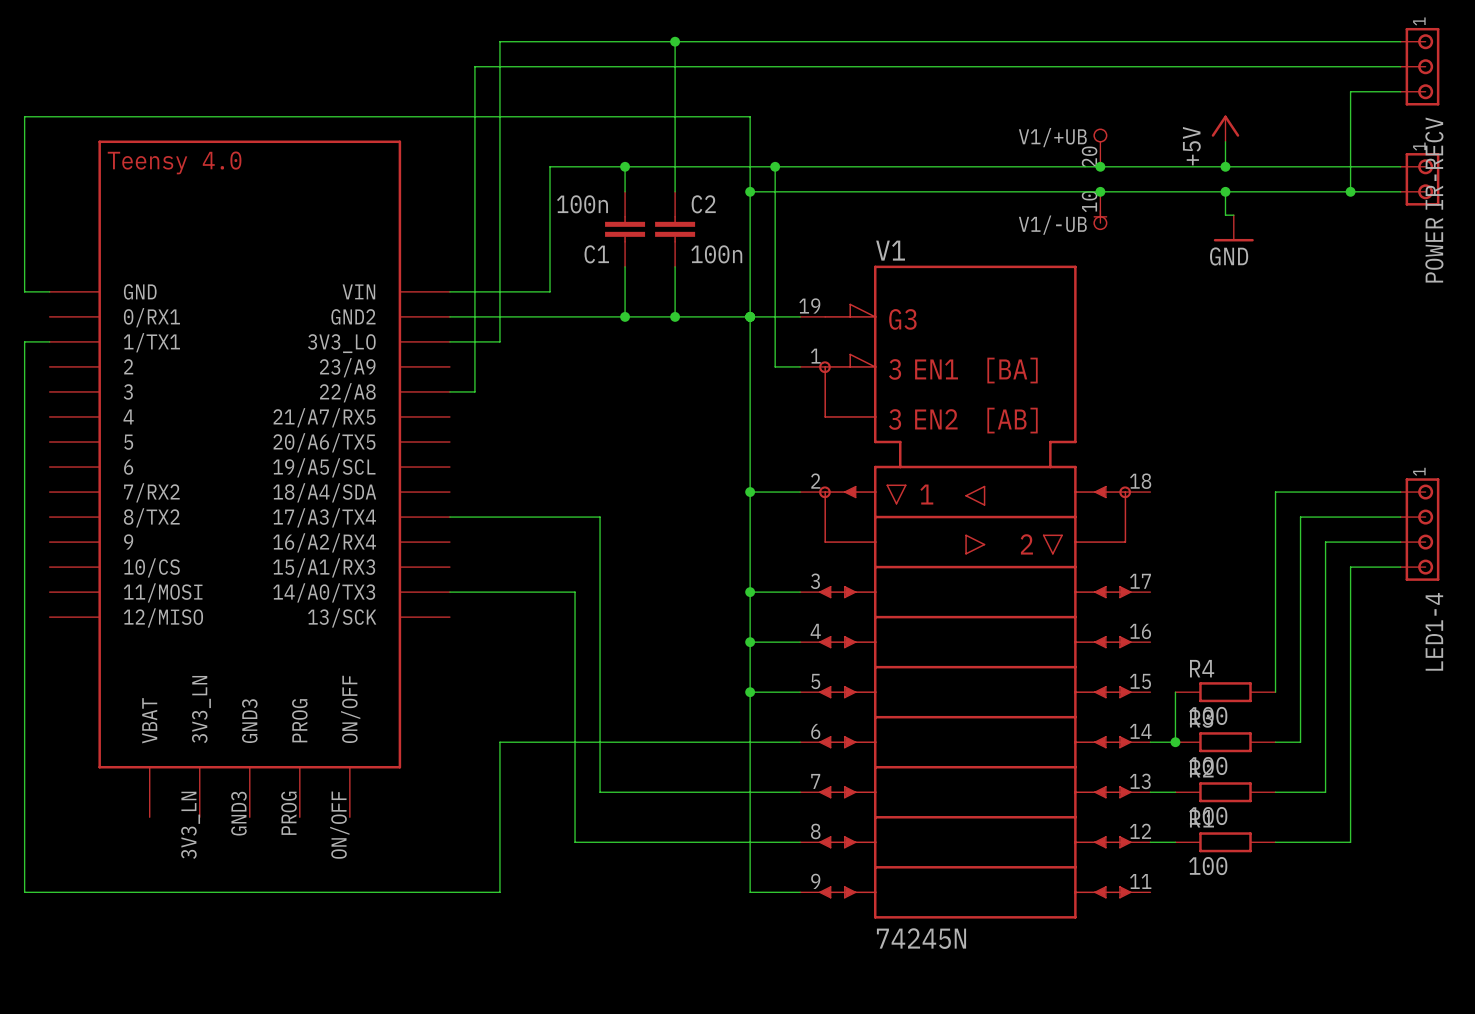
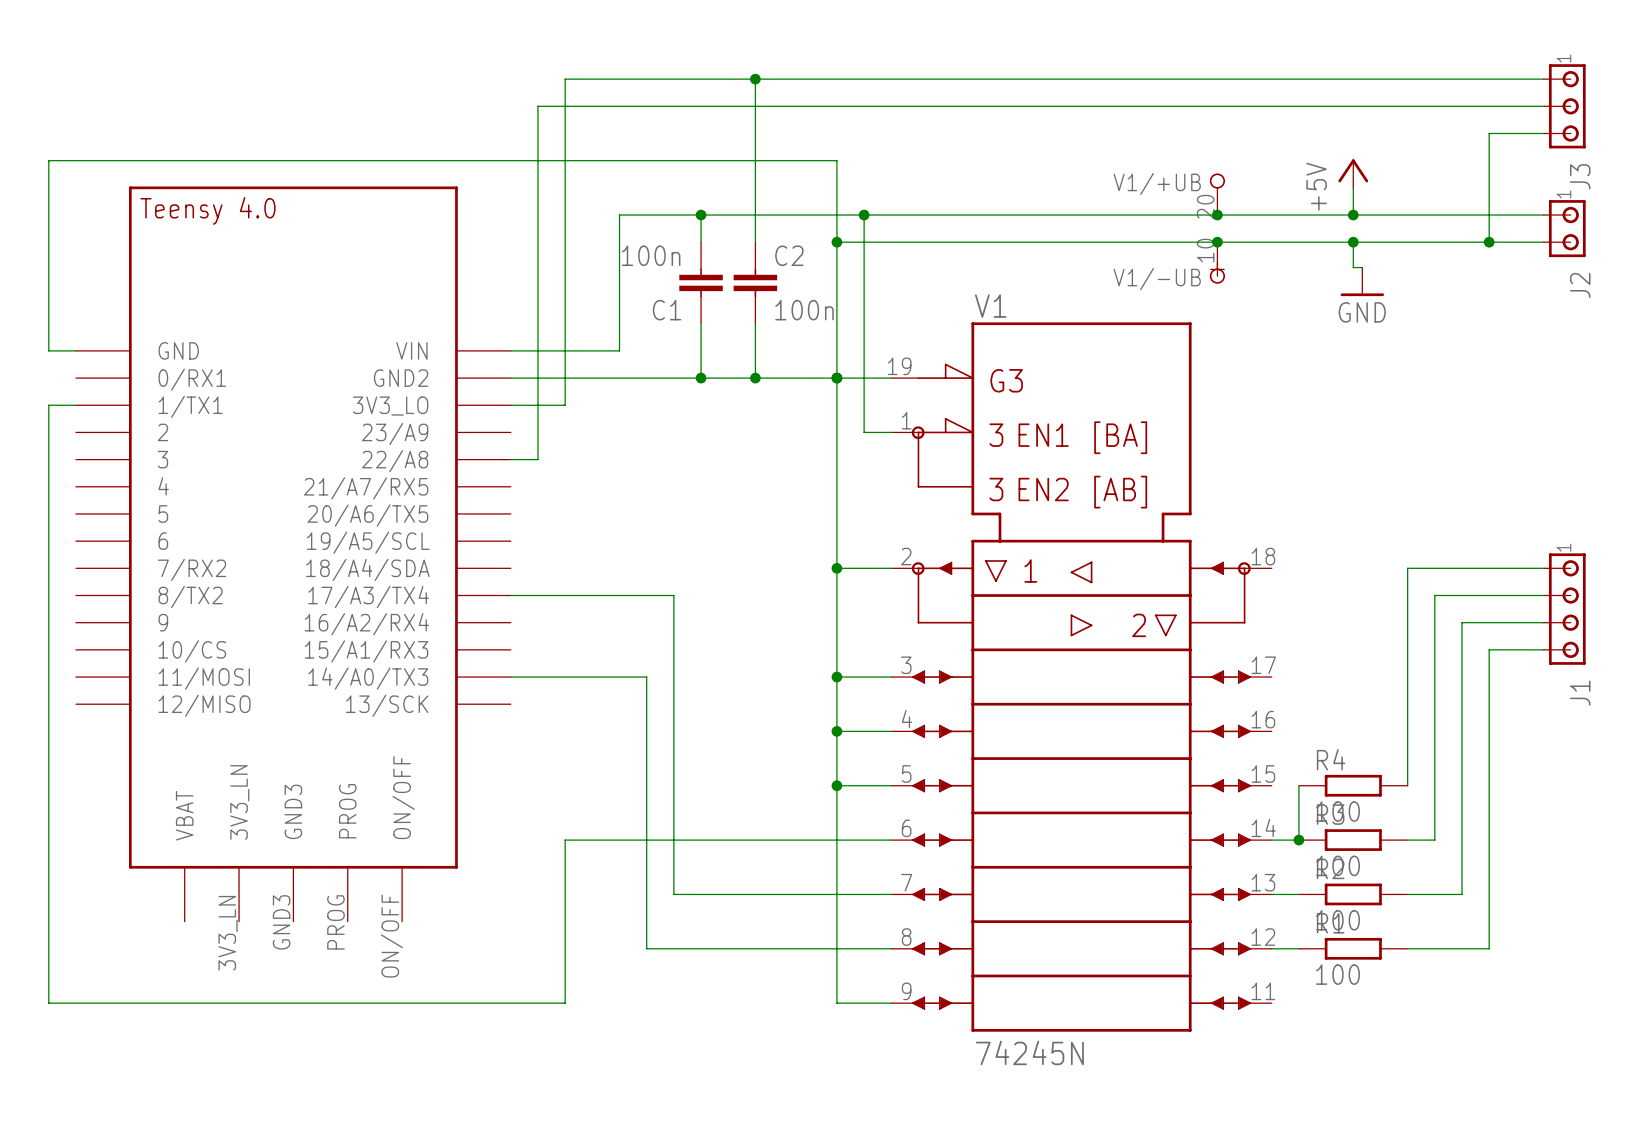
IR-RECV name: IR-RECV (1434, 163) -> J3 (1580, 176)
POWER name: POWER (1434, 250) -> J2 (1580, 285)
LED1-4 name: LED1-4 (1434, 631) -> J1 (1580, 693)

